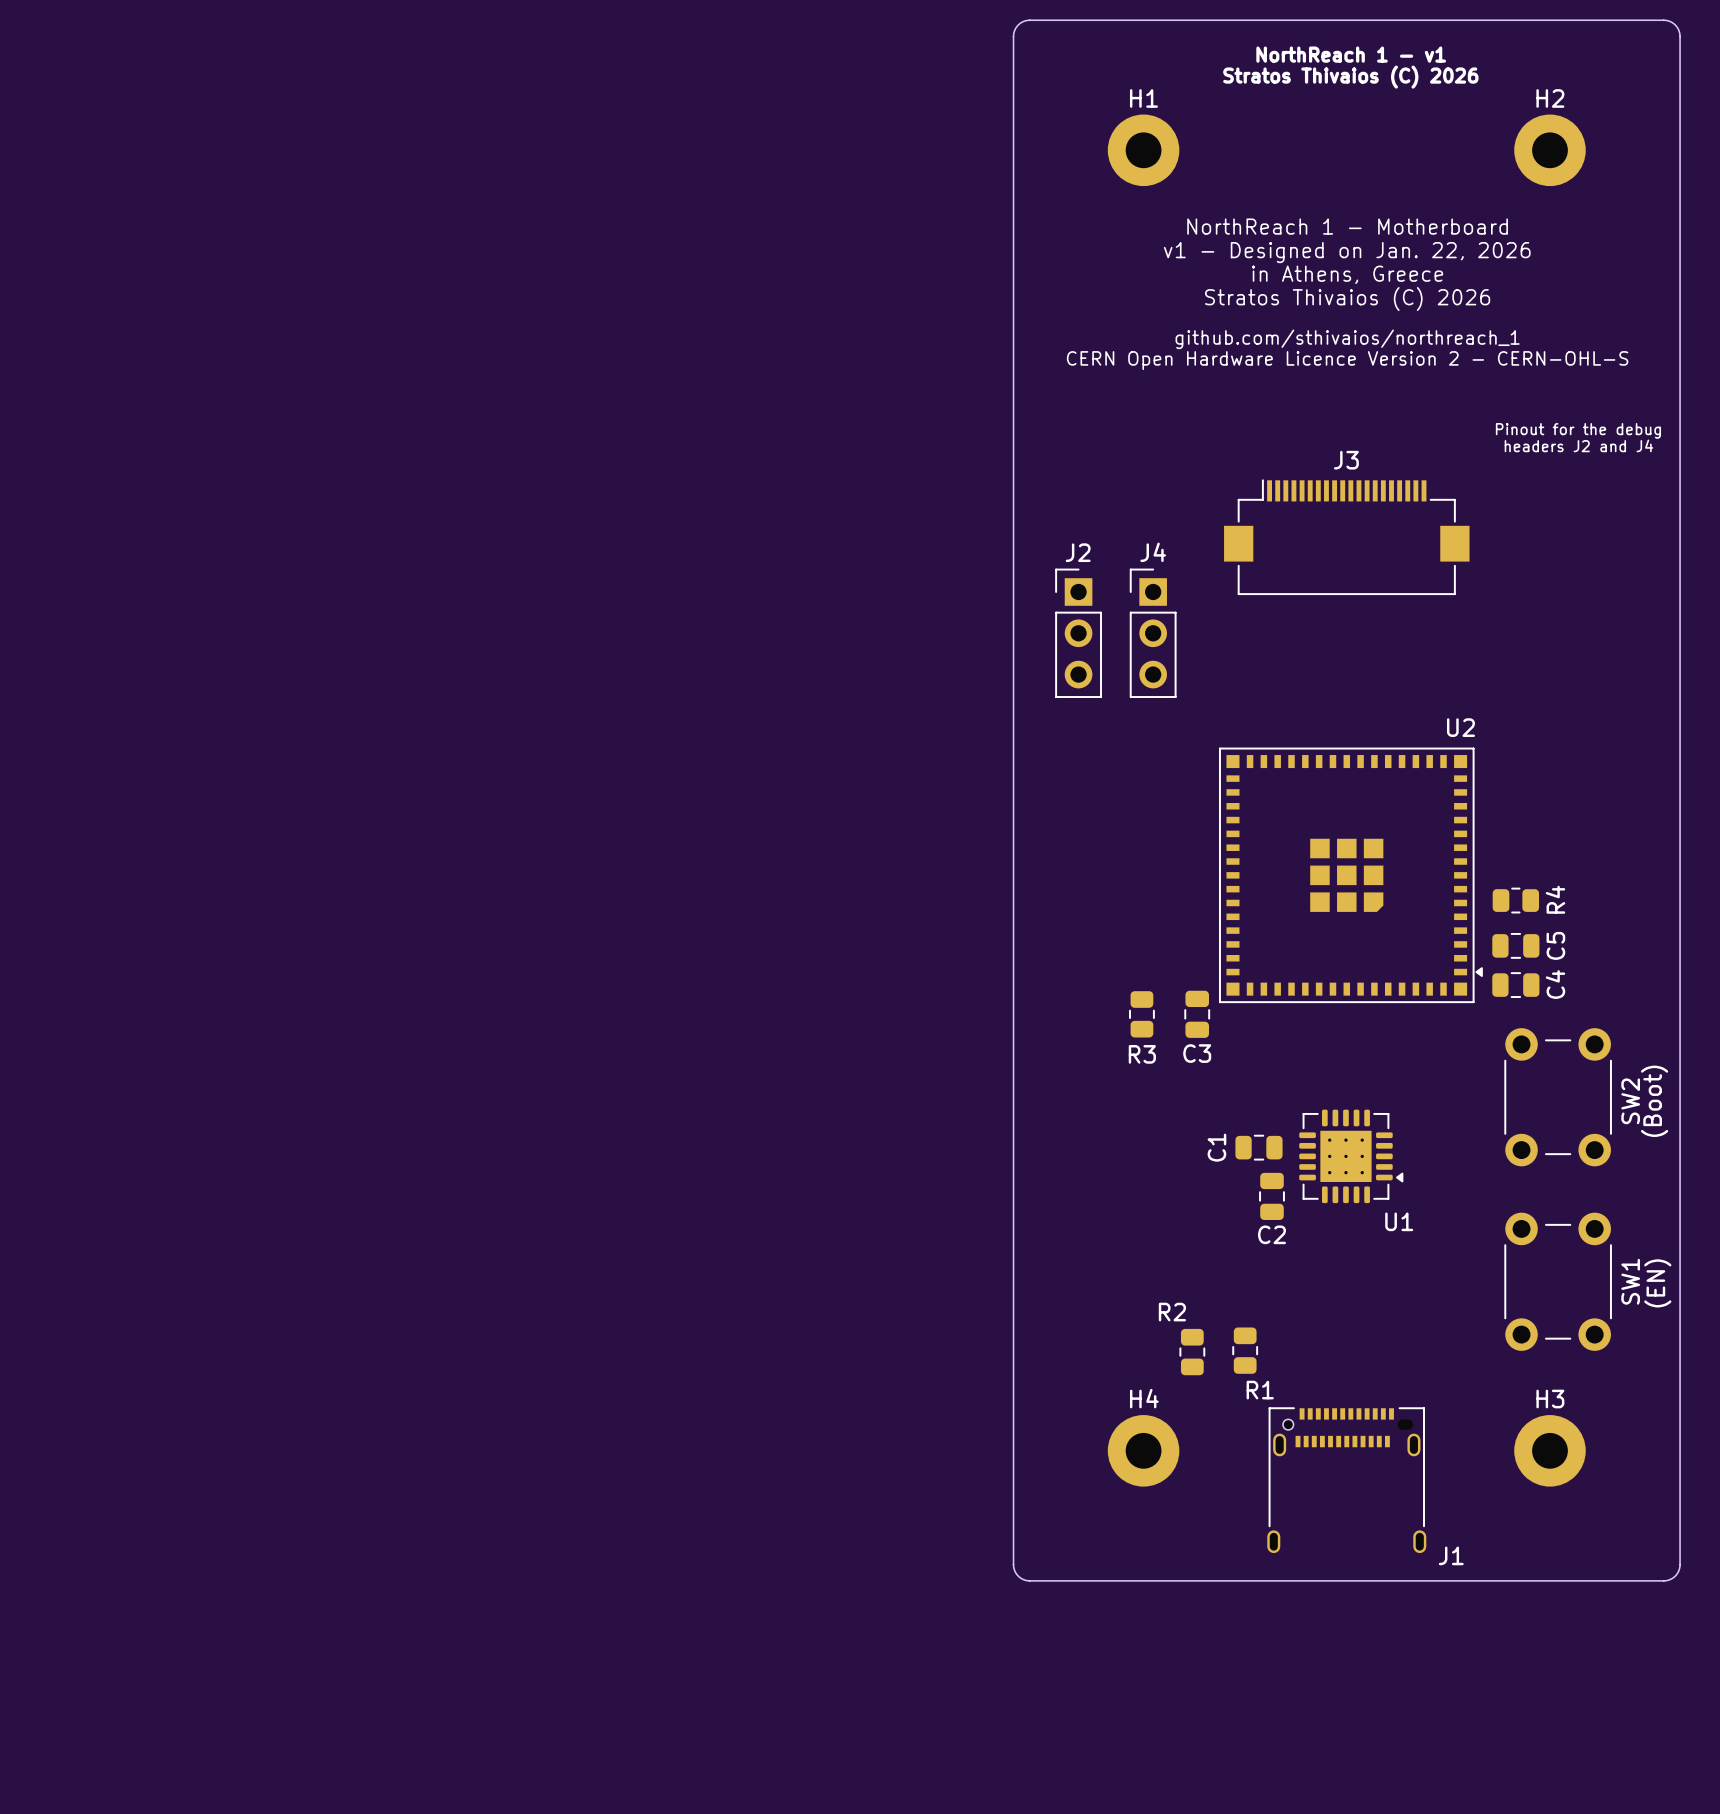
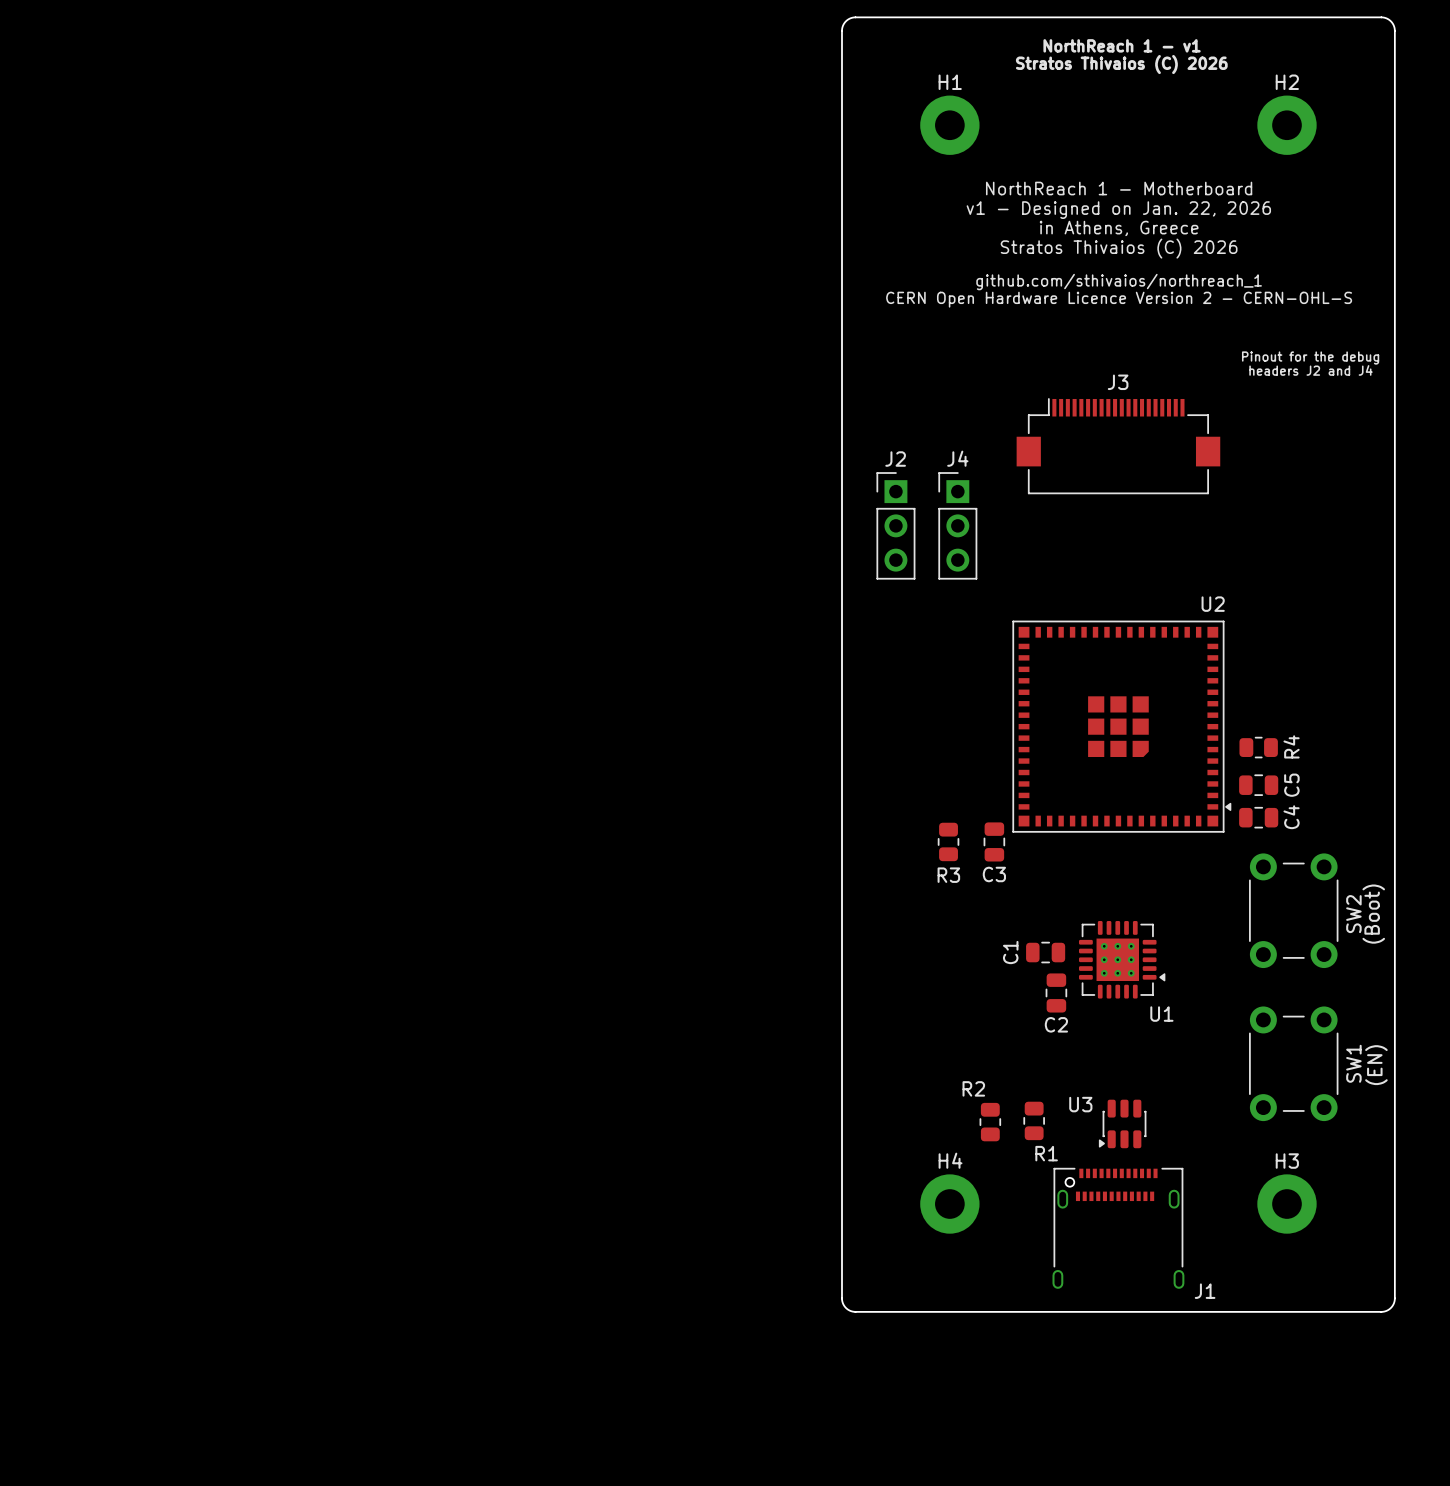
U3: none -> (1122, 1123)

